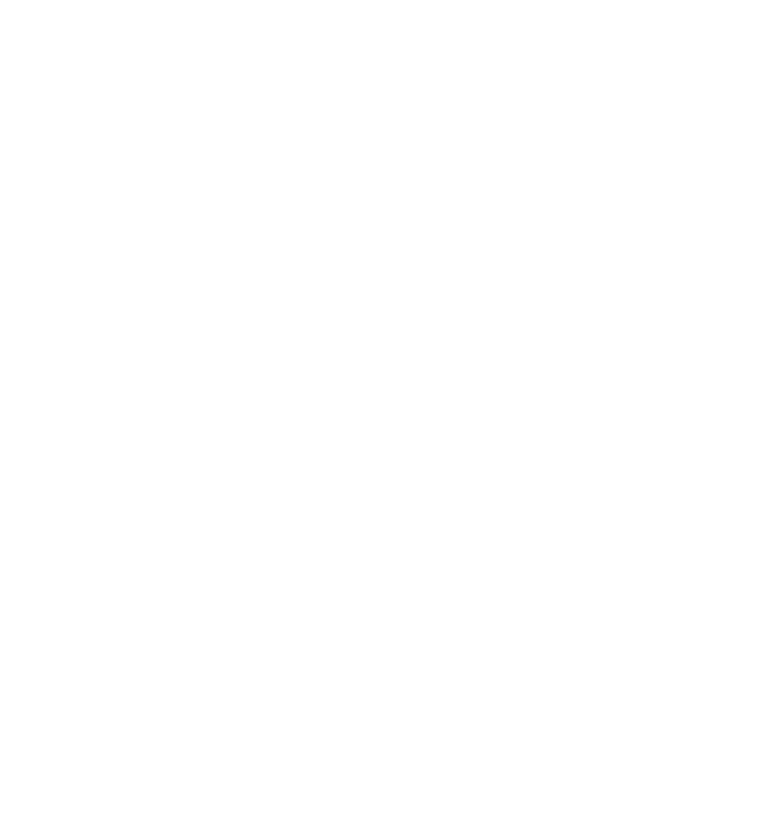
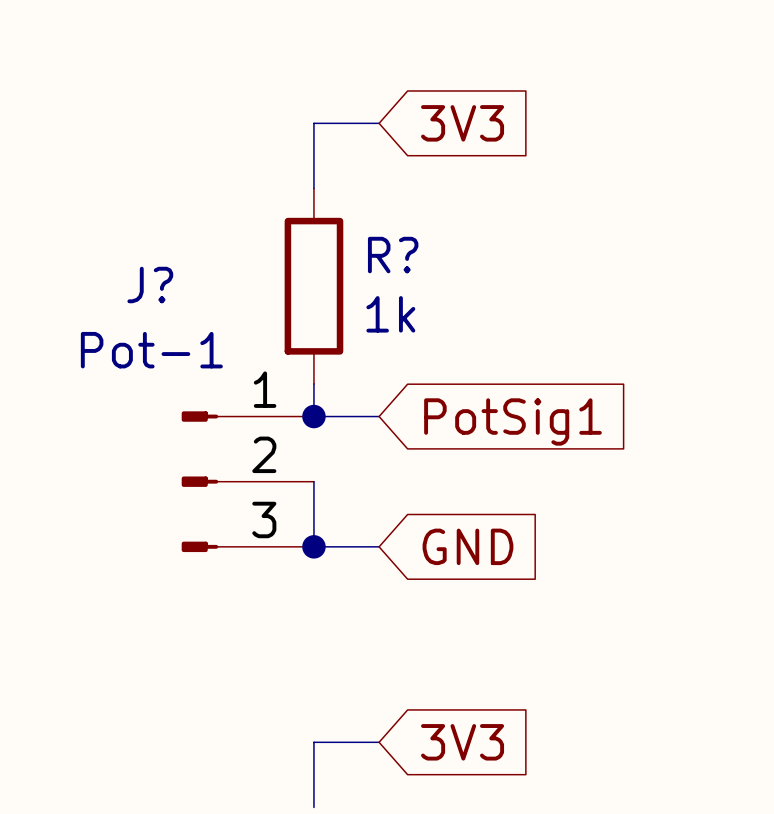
wire: none -> (379, 123) (313, 123) (313, 188)
global label: none -> 3V3 (462, 123)
R?: none -> 1k (313, 286)
wire: none -> (313, 383) (313, 416) (379, 416)
junction: none -> (313, 416)
global label: none -> PotSig1 (512, 421)
J?: none -> Pot-1 (247, 481)
wire: none -> (313, 481) (313, 546) (379, 546)
junction: none -> (313, 546)
global label: none -> GND (467, 546)
wire: none -> (379, 742) (313, 742) (313, 807)
global label: none -> 3V3 (462, 742)

